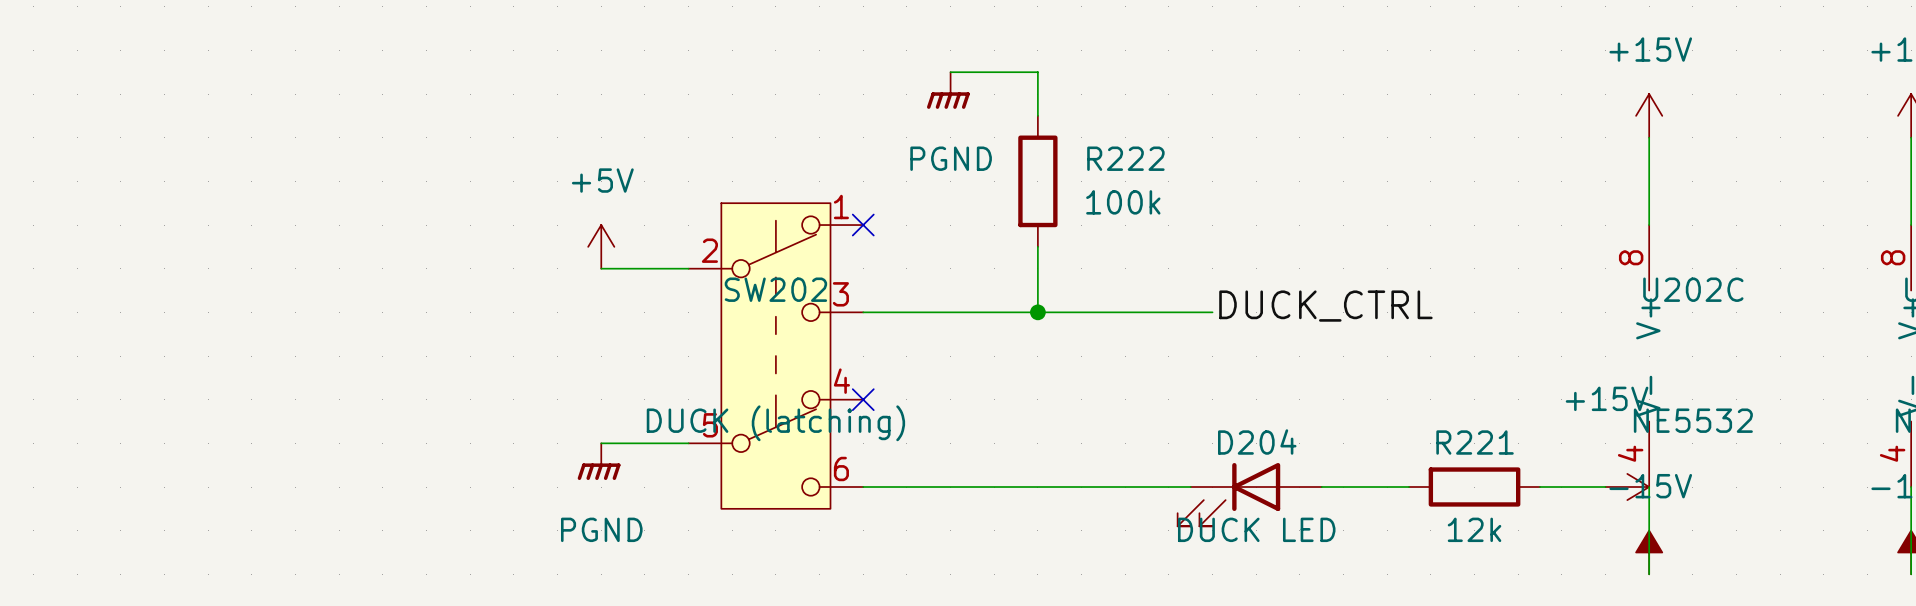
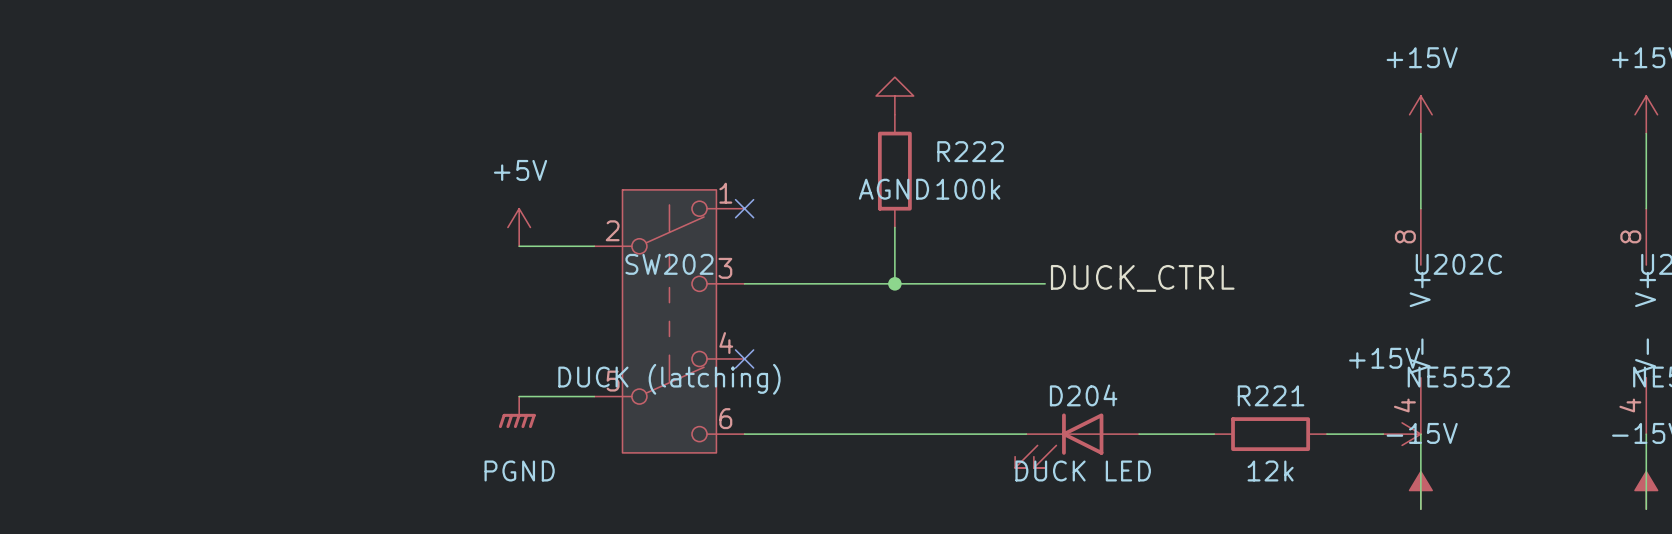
wire: (950, 72) (1037, 72) (1037, 115) -> none
power symbol: PGND (948, 90) -> none
power symbol: none -> AGND (894, 95)

